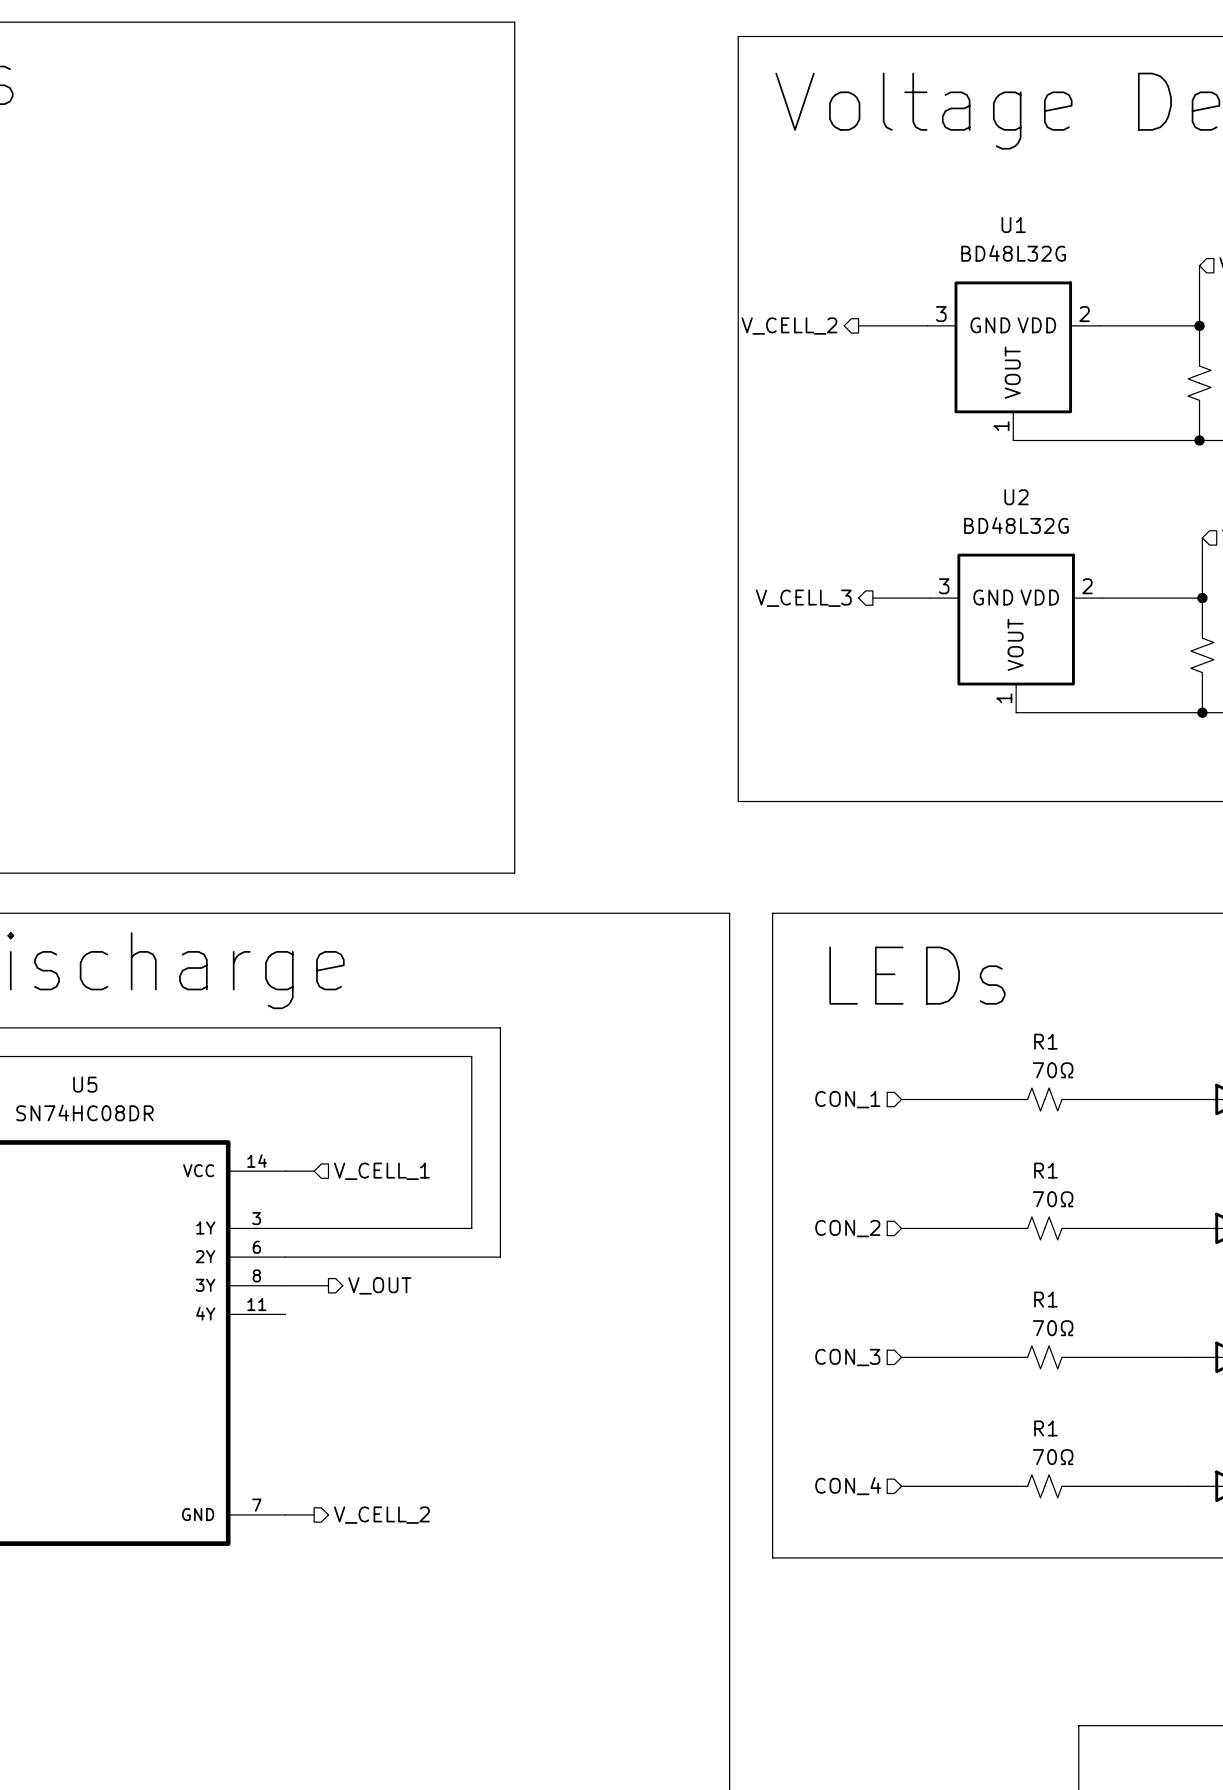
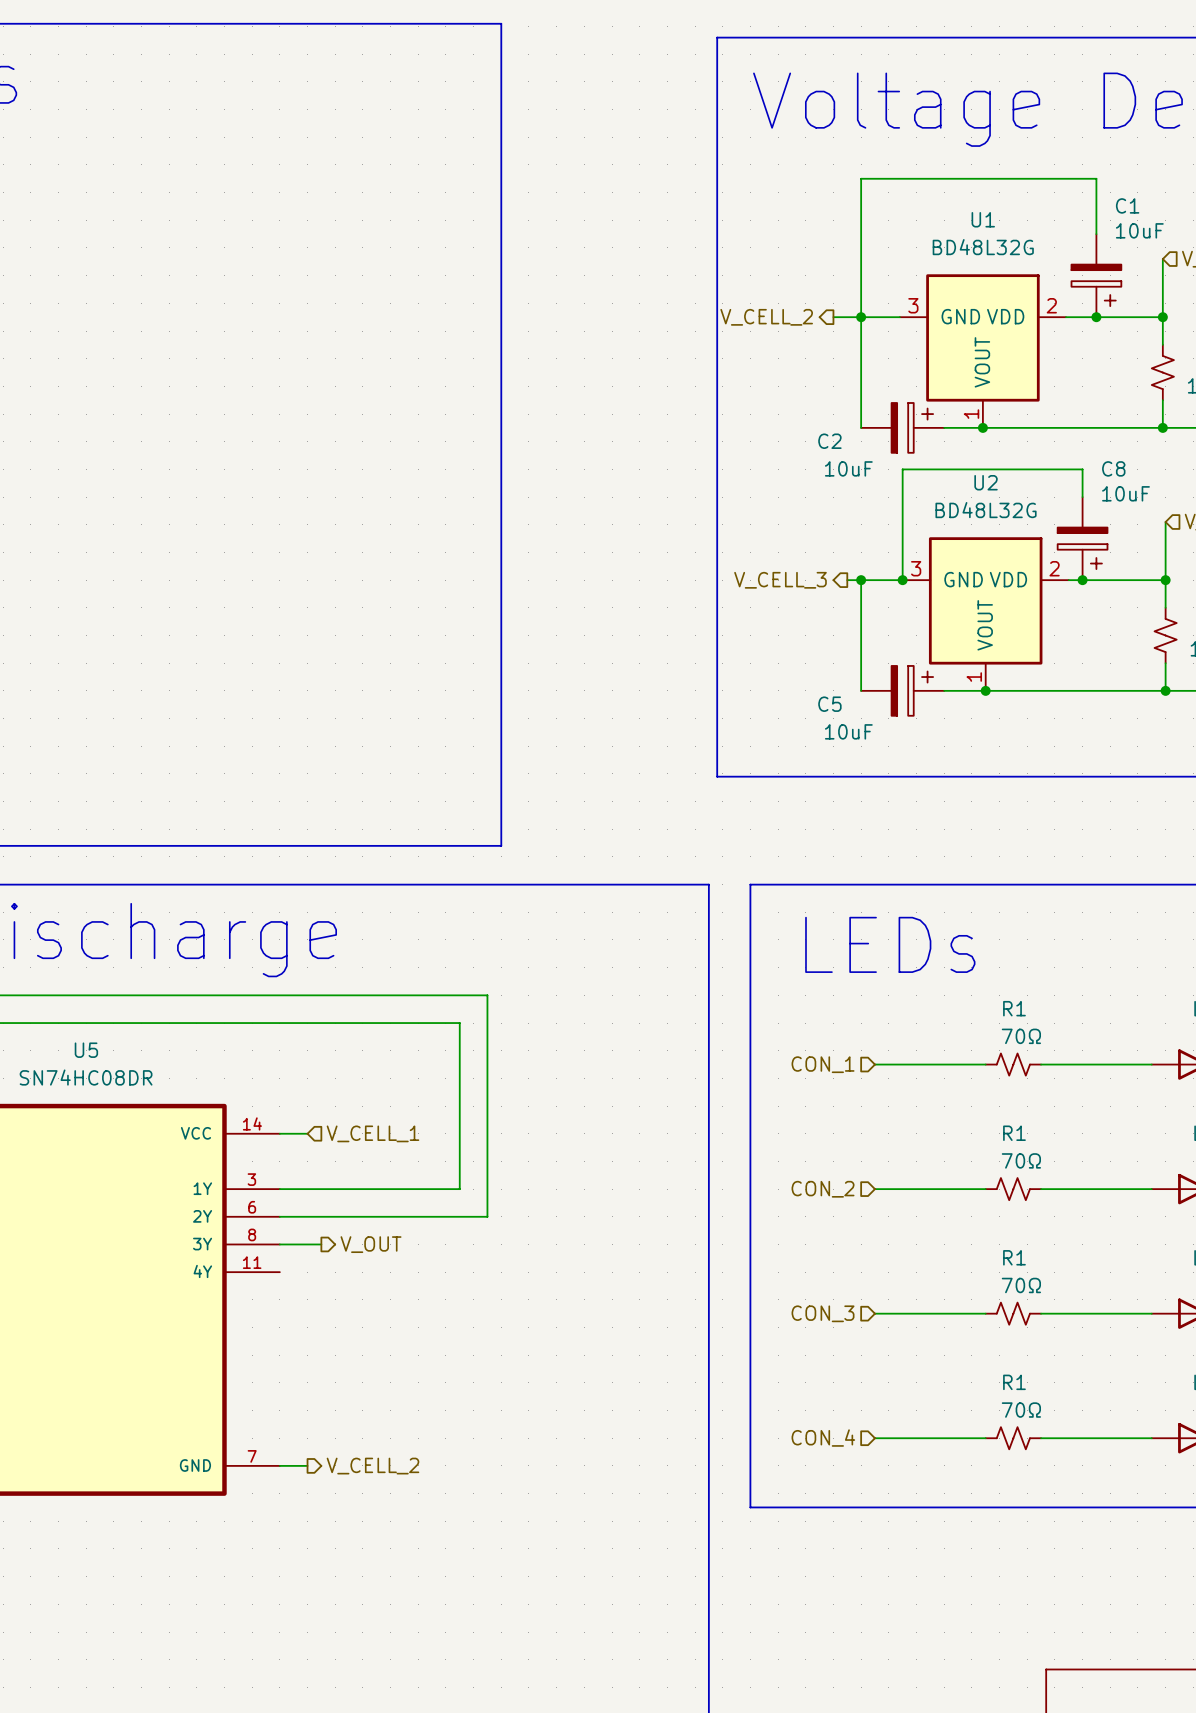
wire: none -> (1096, 234) (1096, 178) (861, 178) (861, 427)
C1: none -> 10uF (1096, 275)
junction: none -> (861, 317)
junction: none -> (1096, 317)
C2: none -> 10uF (902, 427)
wire: none -> (944, 427) (982, 427)
junction: none -> (982, 427)
wire: none -> (1082, 497) (1082, 469) (902, 469) (902, 580)
C8: none -> 10uF (1082, 538)
wire: none -> (861, 580) (861, 690)
junction: none -> (861, 580)
junction: none -> (902, 580)
junction: none -> (1082, 580)
C5: none -> 10uF (902, 690)
wire: none -> (944, 690) (985, 690)
junction: none -> (985, 690)

